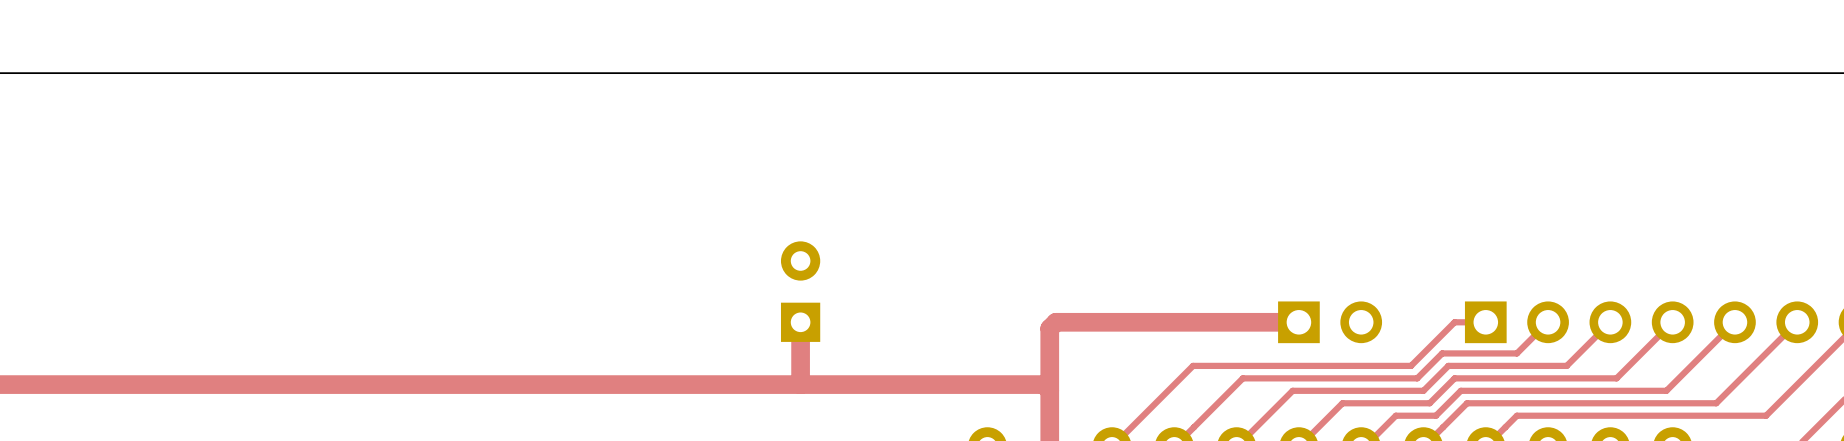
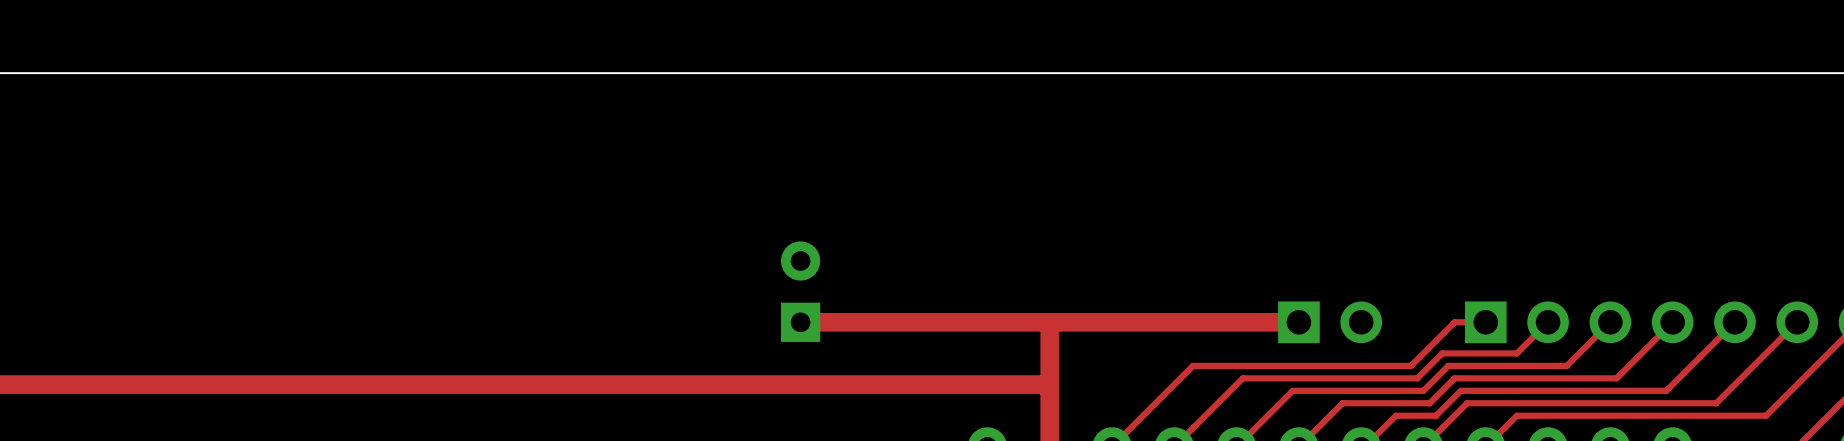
top track: (800, 322) (800, 384) -> (800, 322) (1055, 322)

